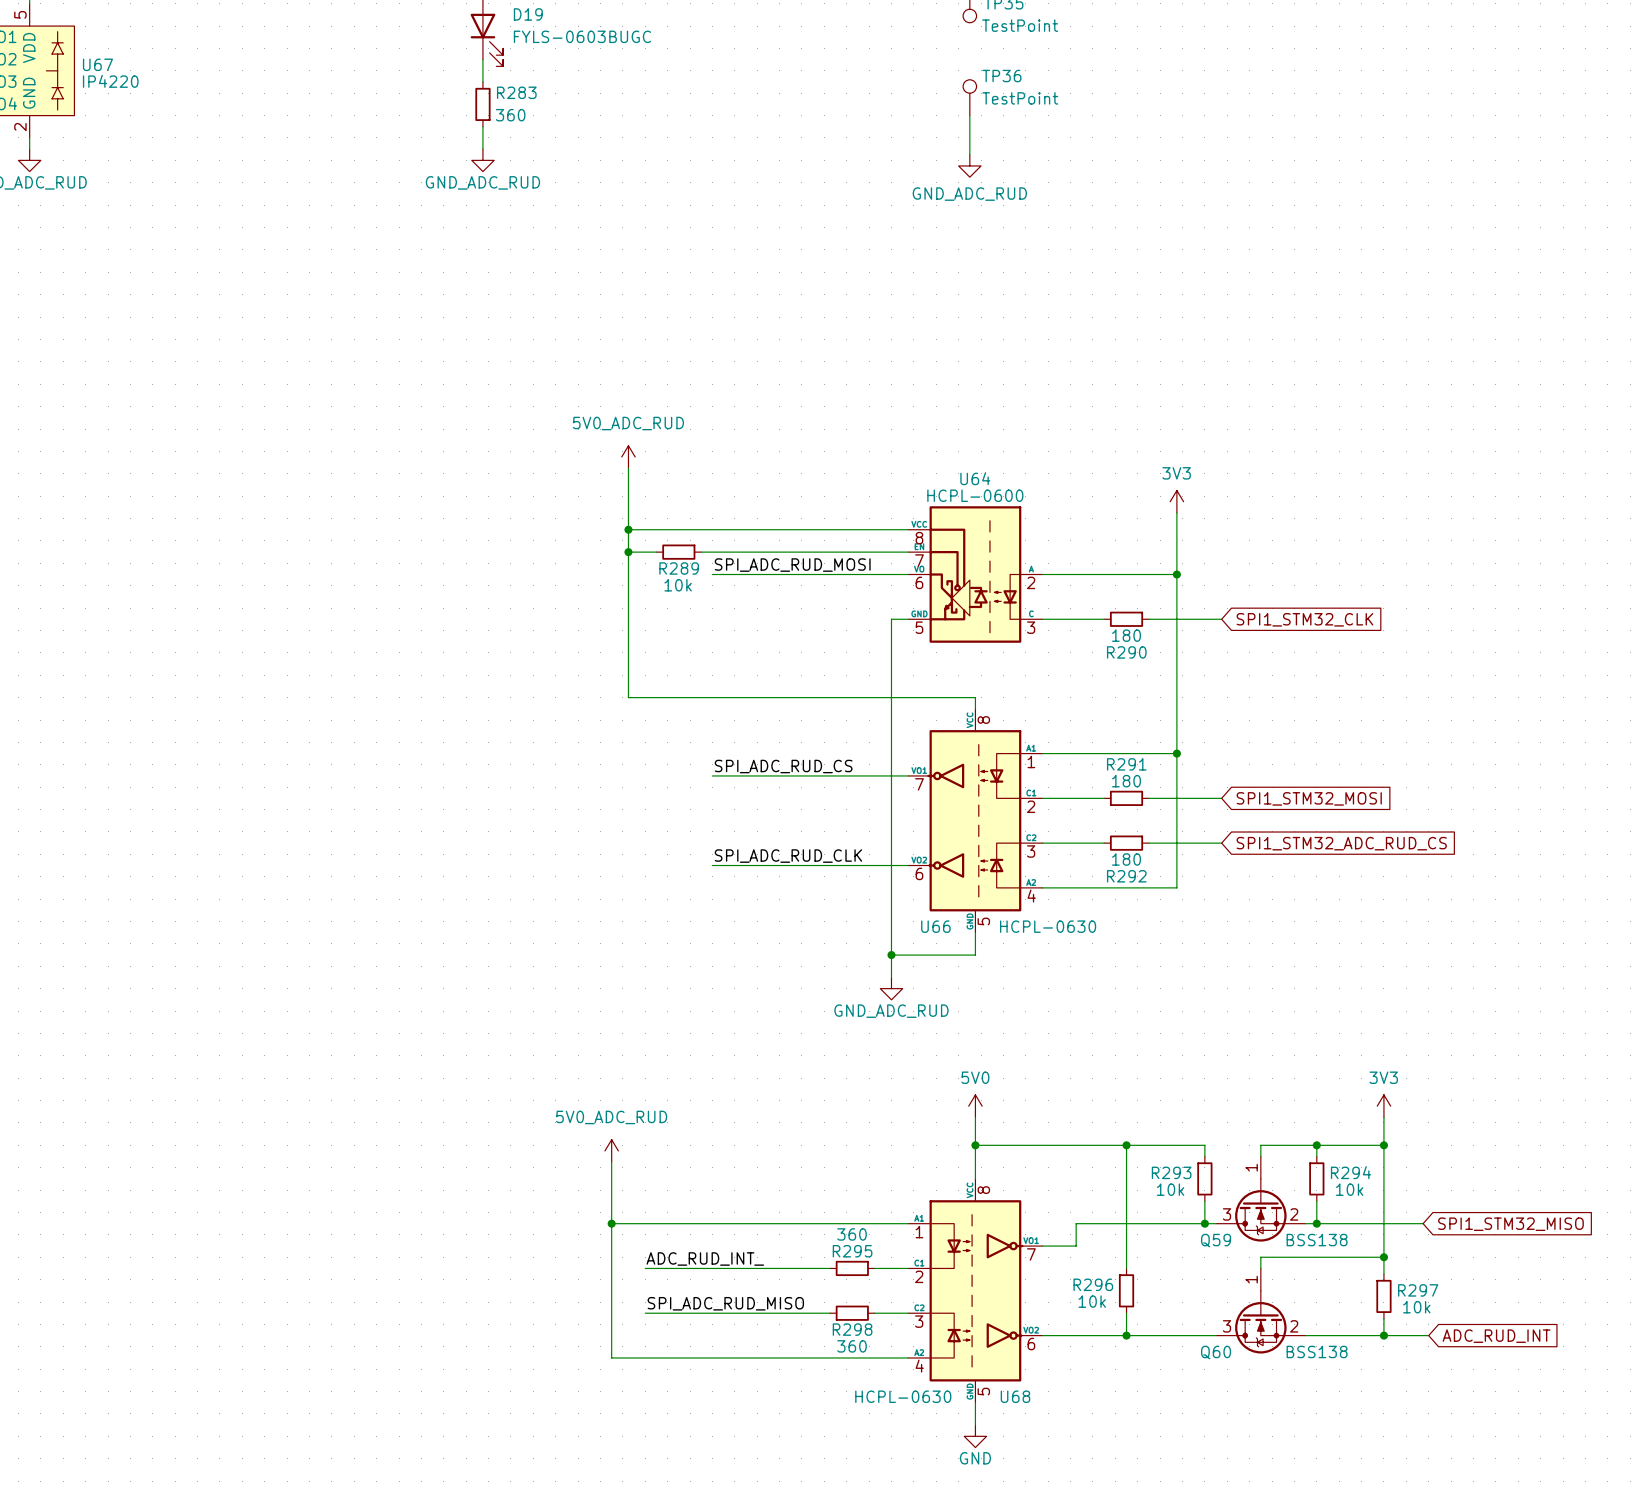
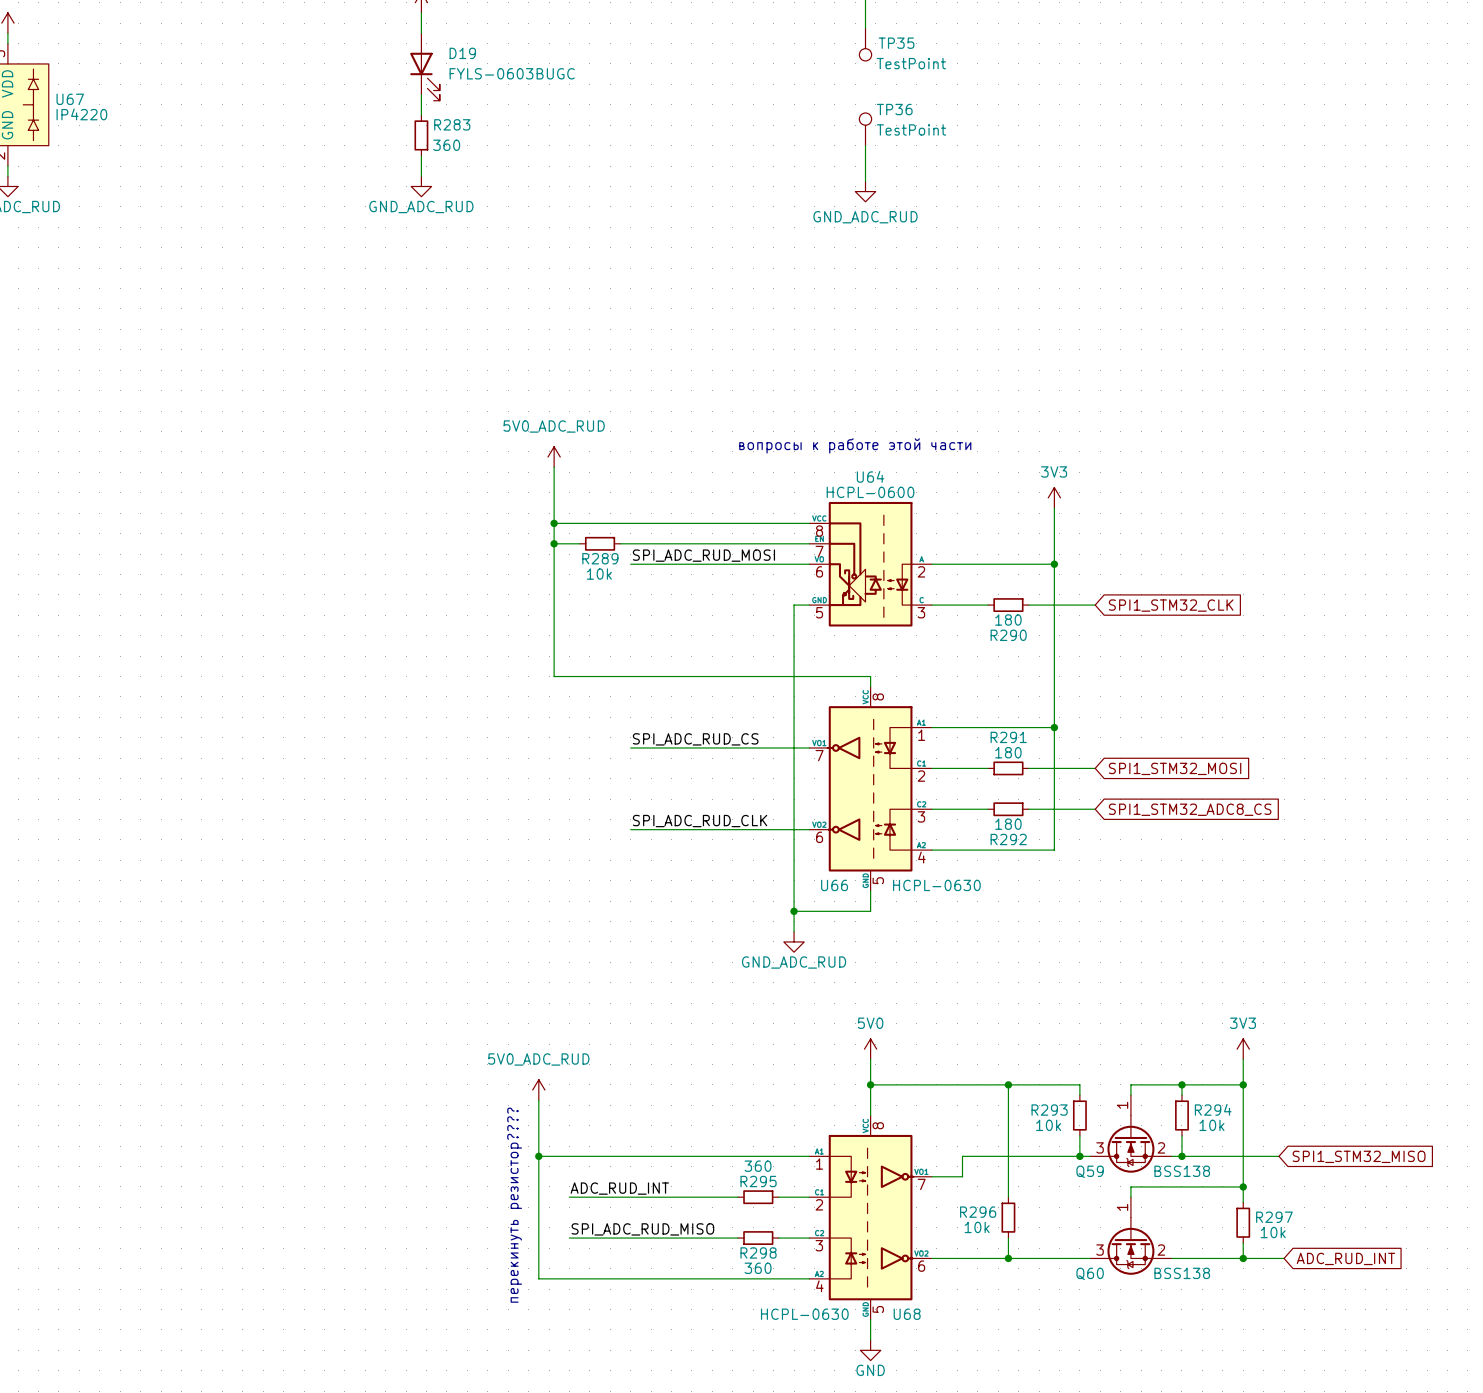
text: none -> вопросы к работе этой части (855, 445)
global label: SPI1_STM32_ADC_RUD_CS (1341, 843) -> SPI1_STM32_ADC8_CS (1190, 809)
label: ADC_RUD_INT_ (705, 1258) -> ADC_RUD_INT (619, 1188)
text: none -> перeкинуть резистор???? (514, 1205)

